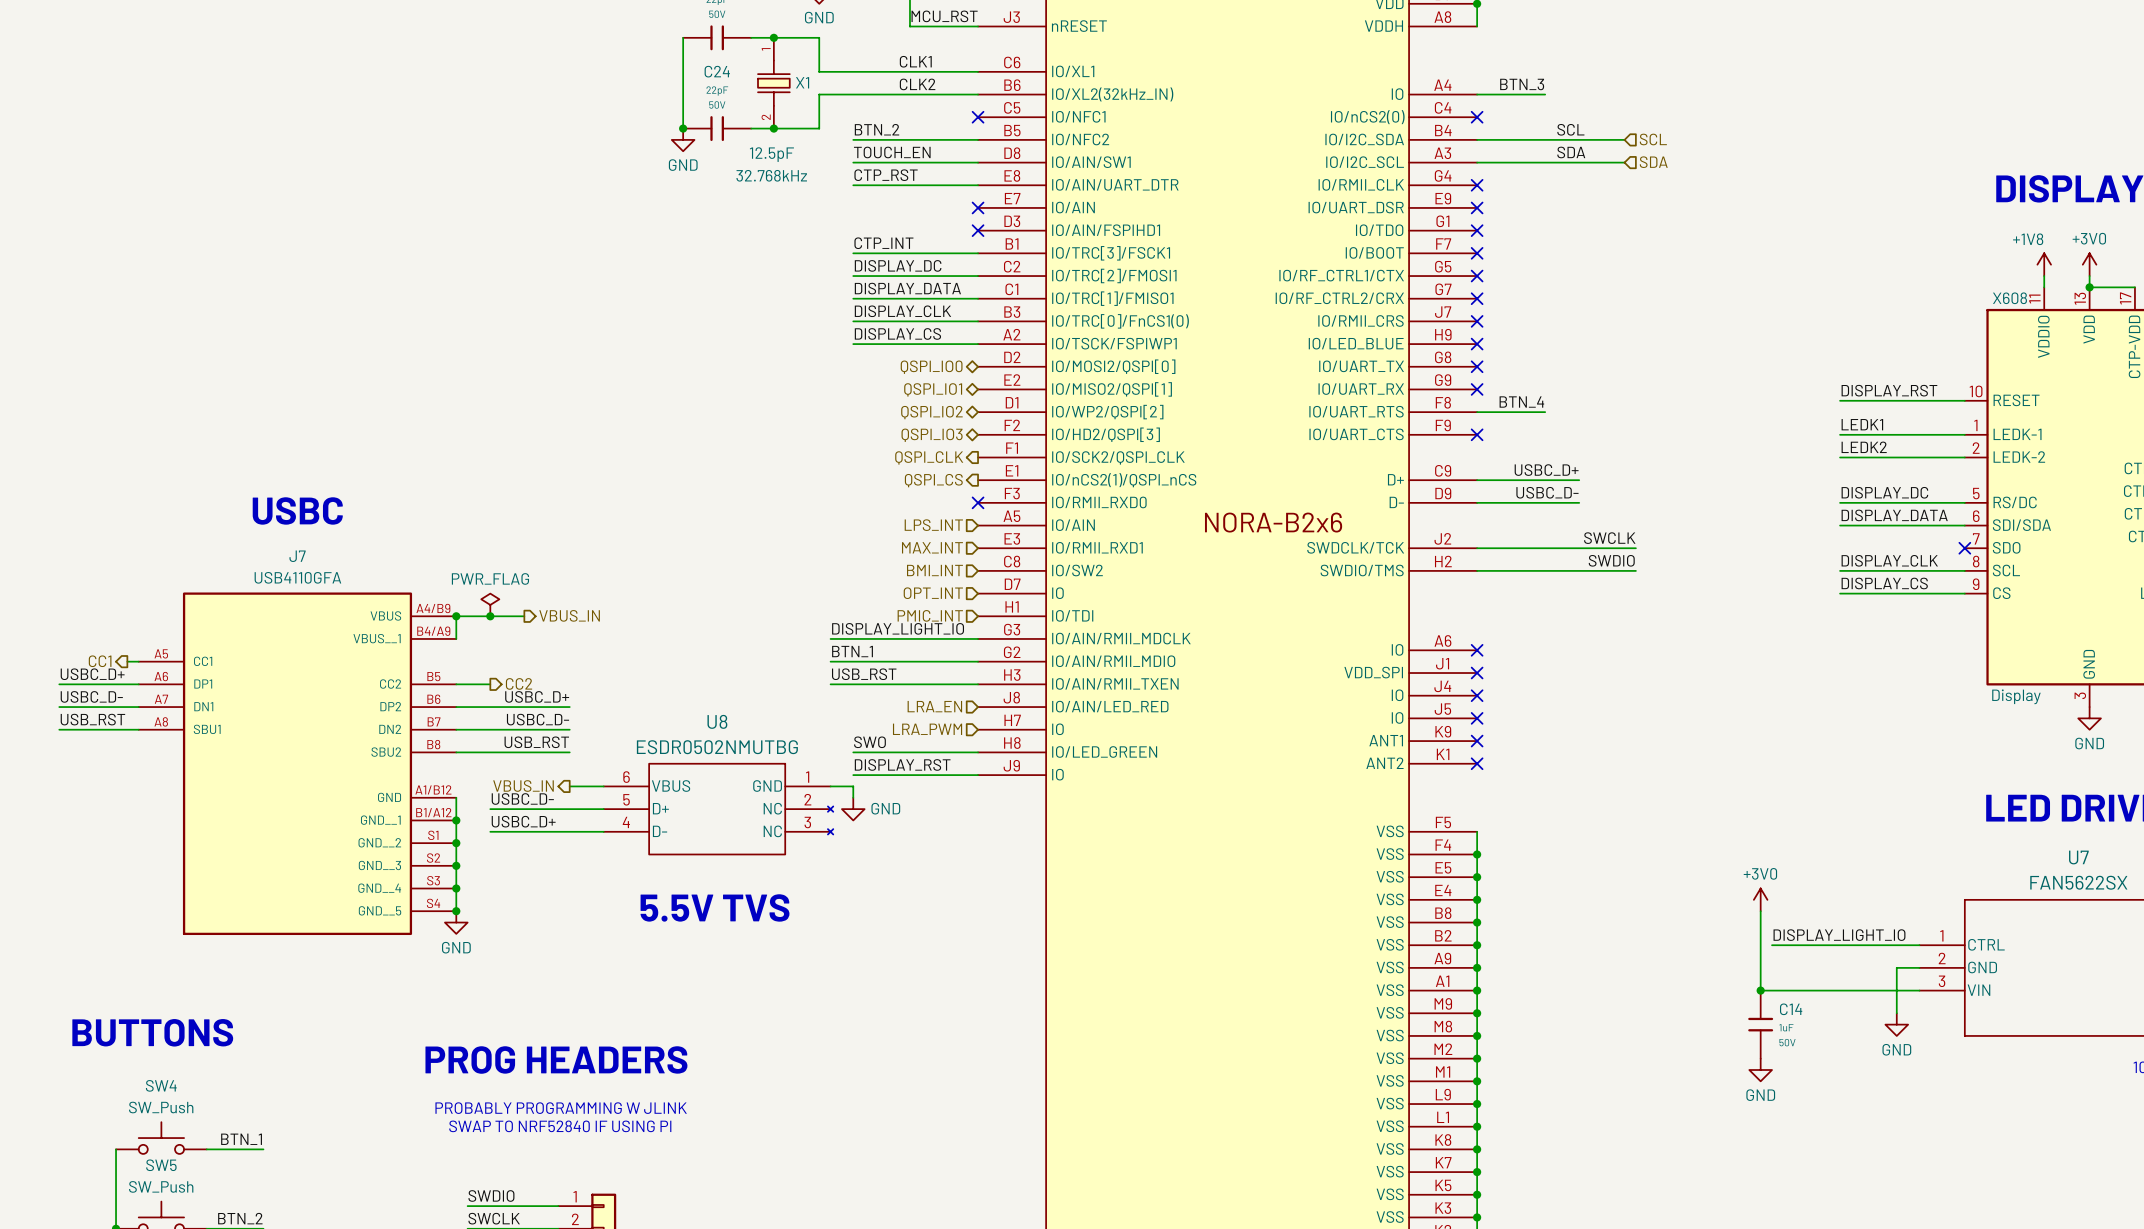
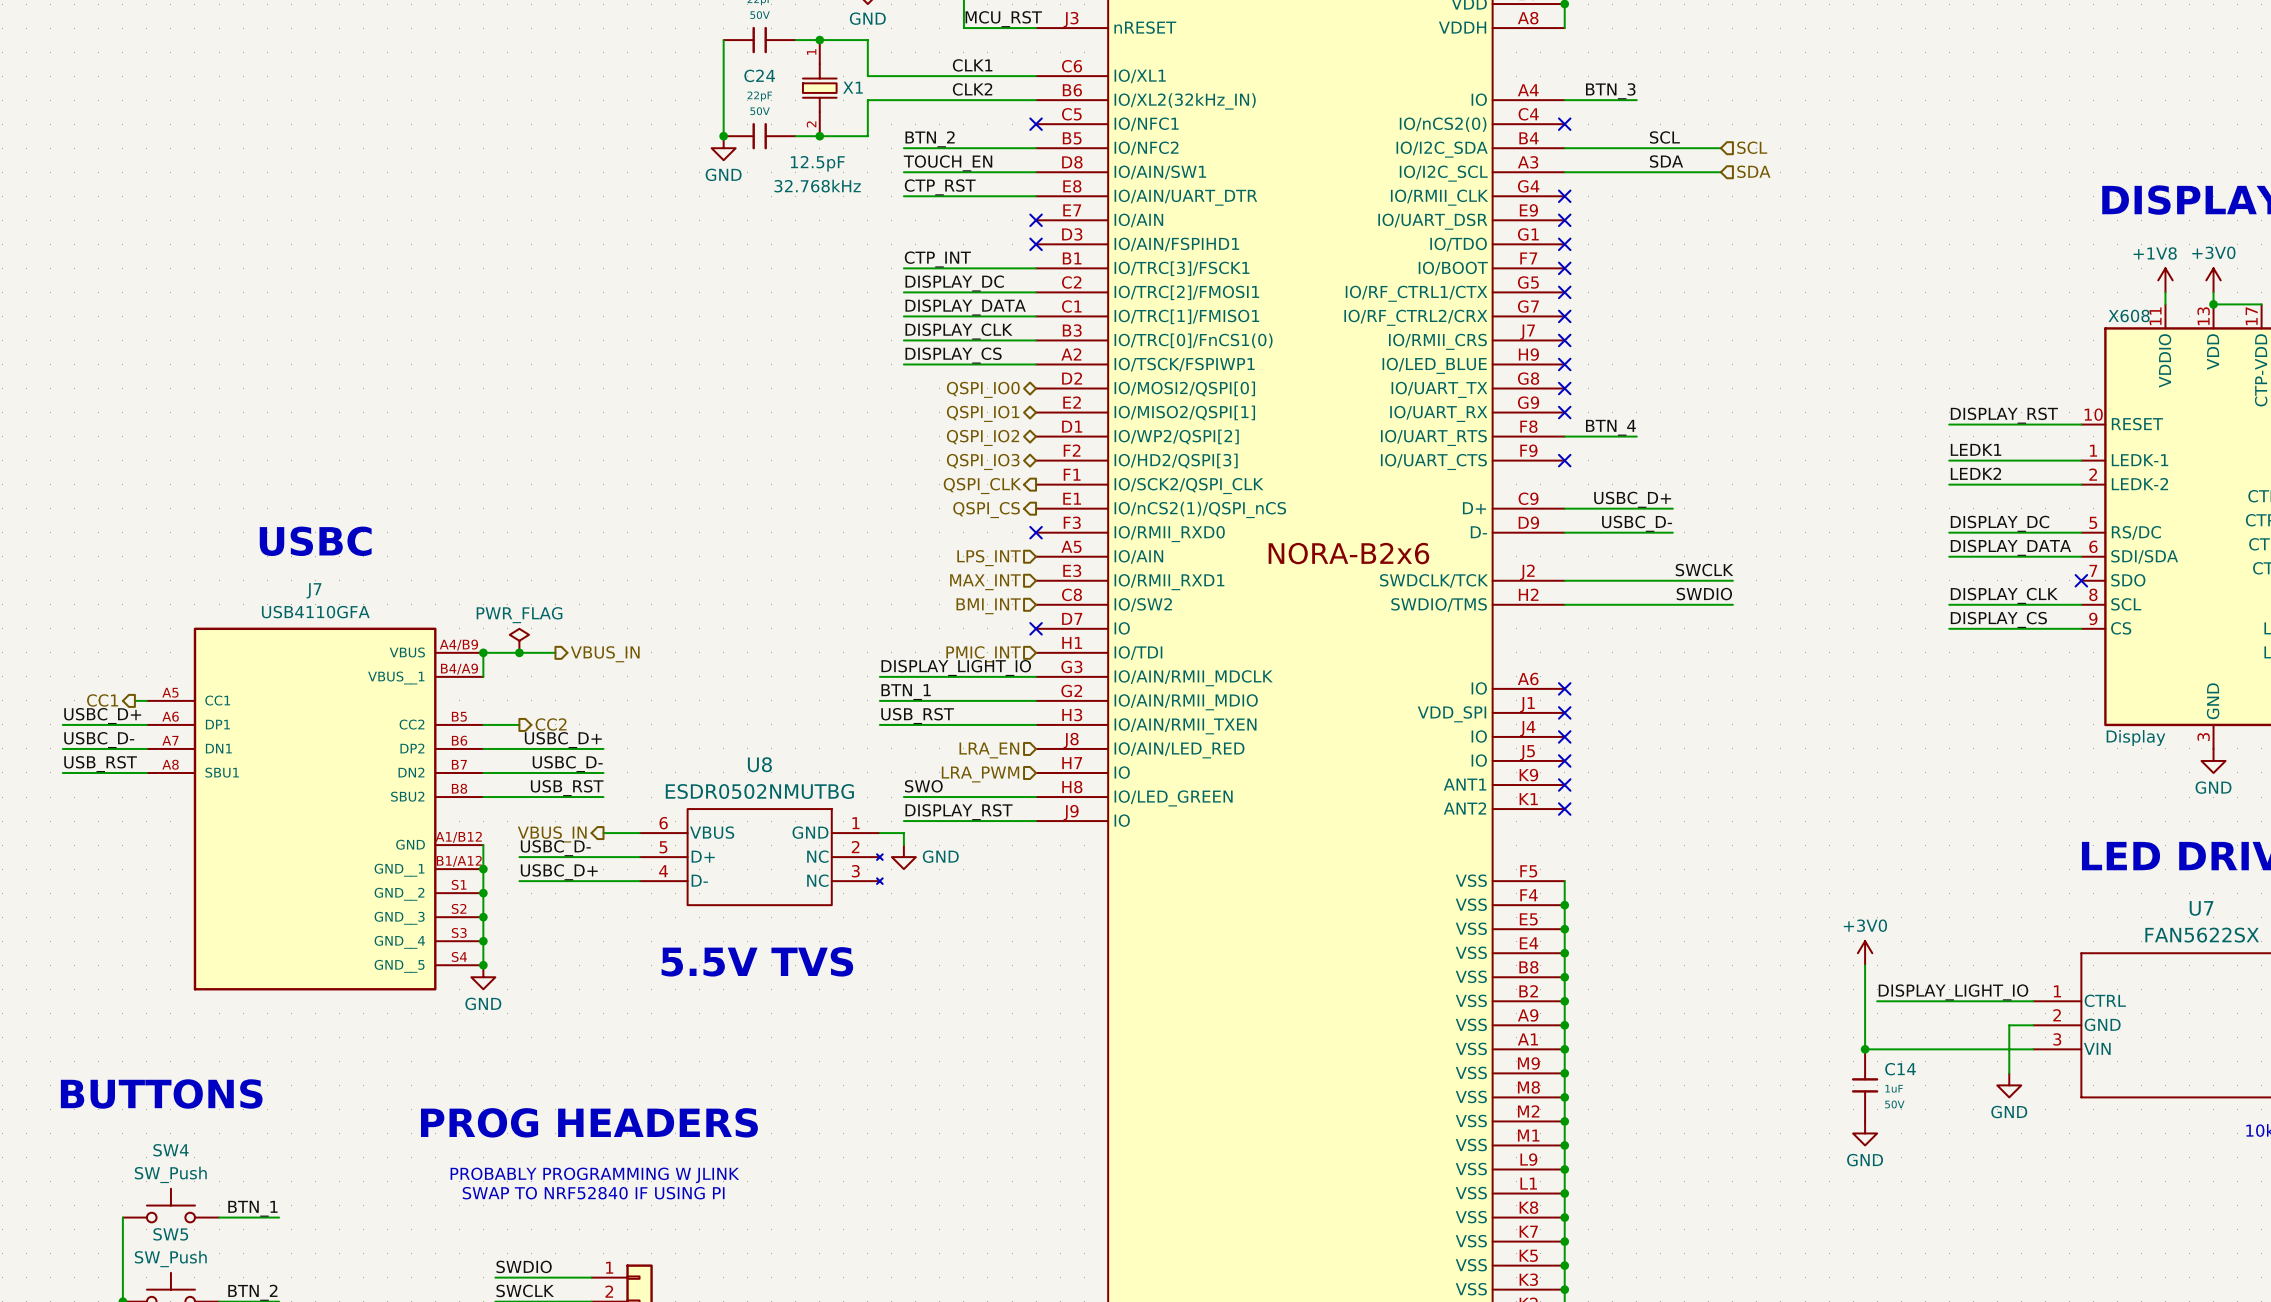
hierarchical label: OPT_INT (933, 593) -> none
no-connect mark: none -> (1036, 628)

